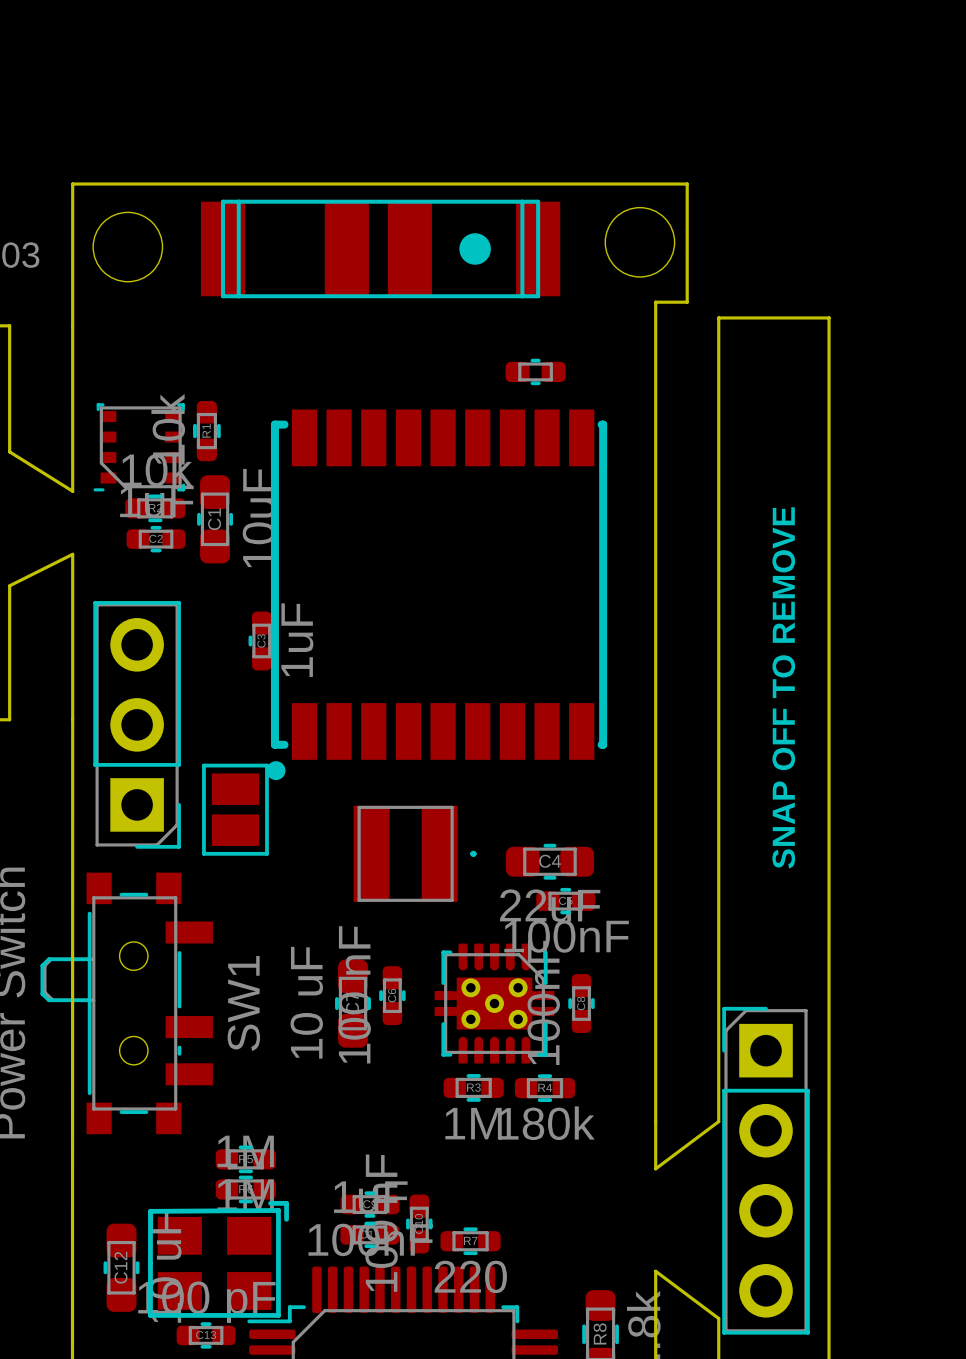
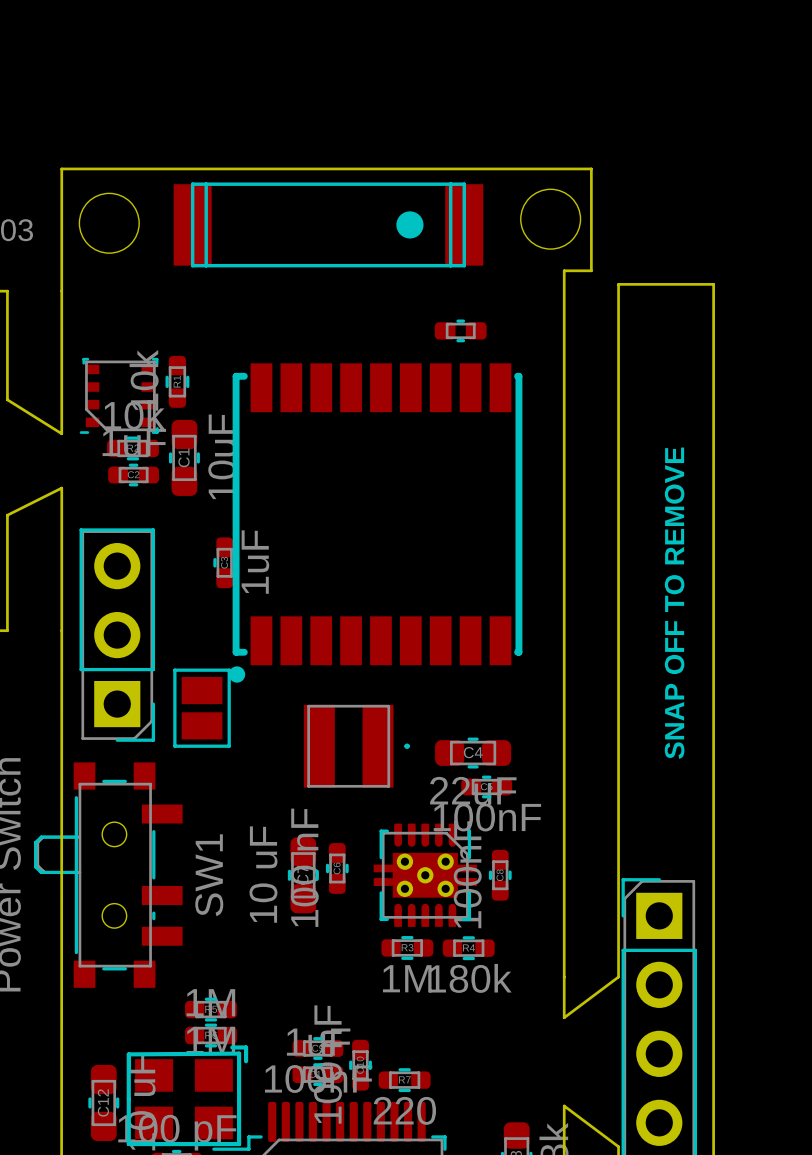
part footprint: [200, 199, 561, 299] -> [173, 182, 484, 268]

